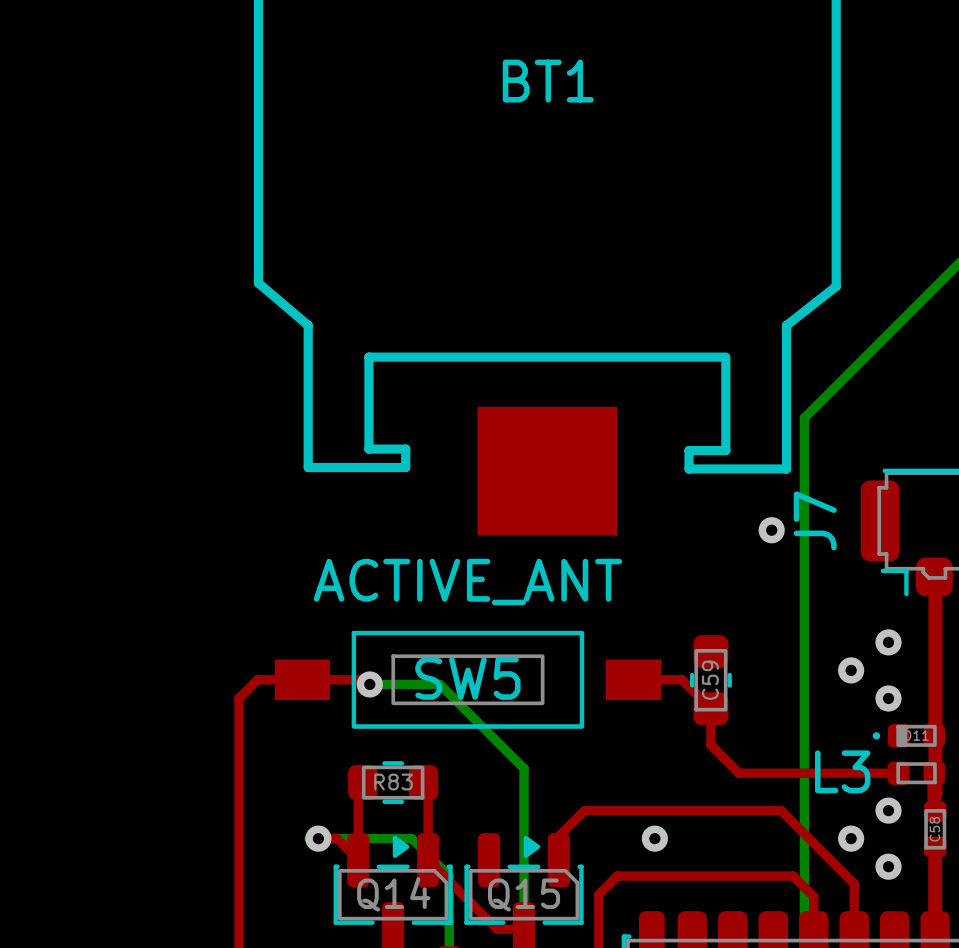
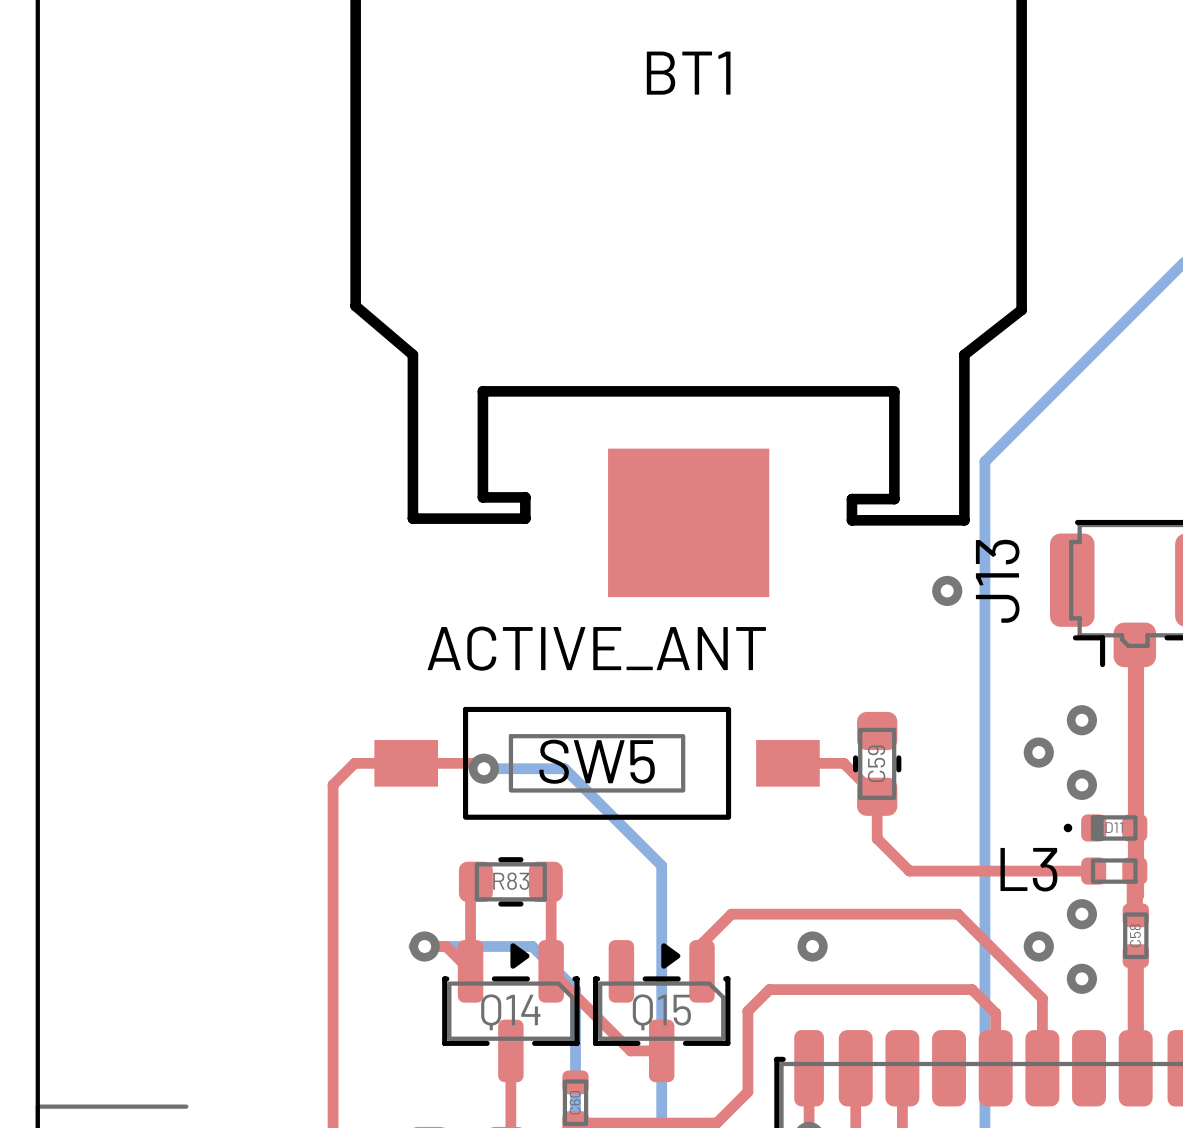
J7 name: J7 (815, 520) -> J13 (997, 581)

